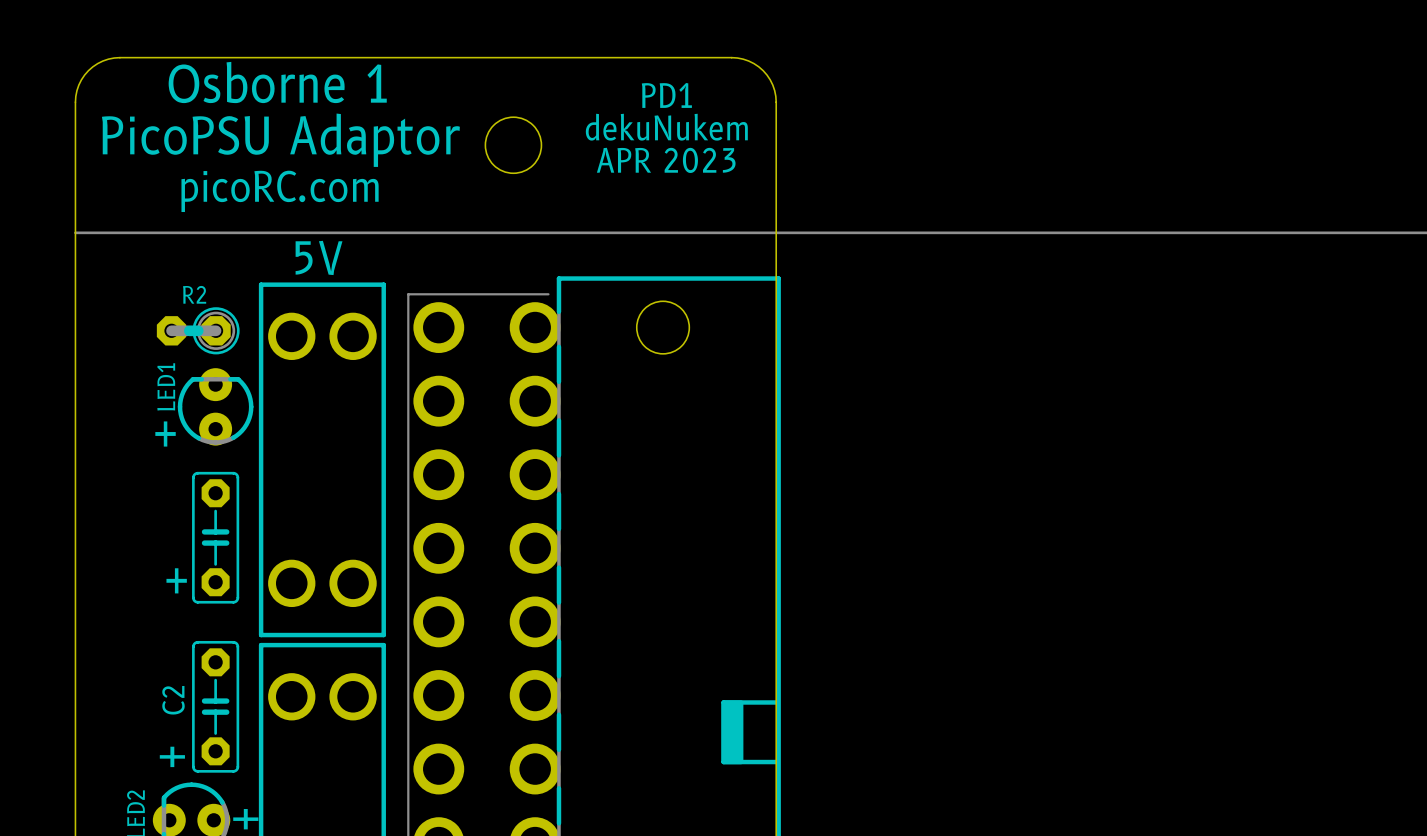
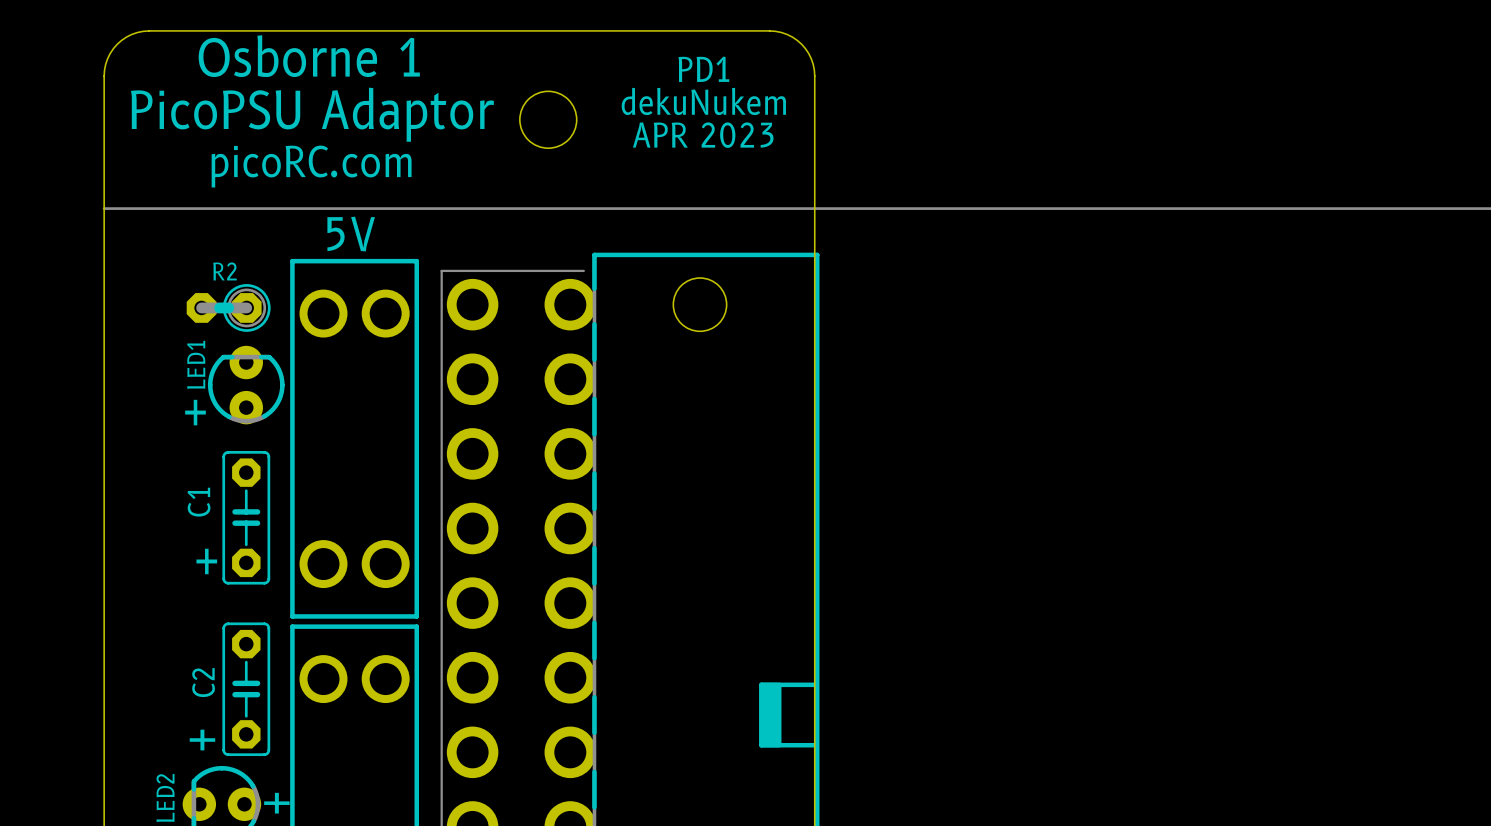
C1 name: none -> C1 (199, 502)

